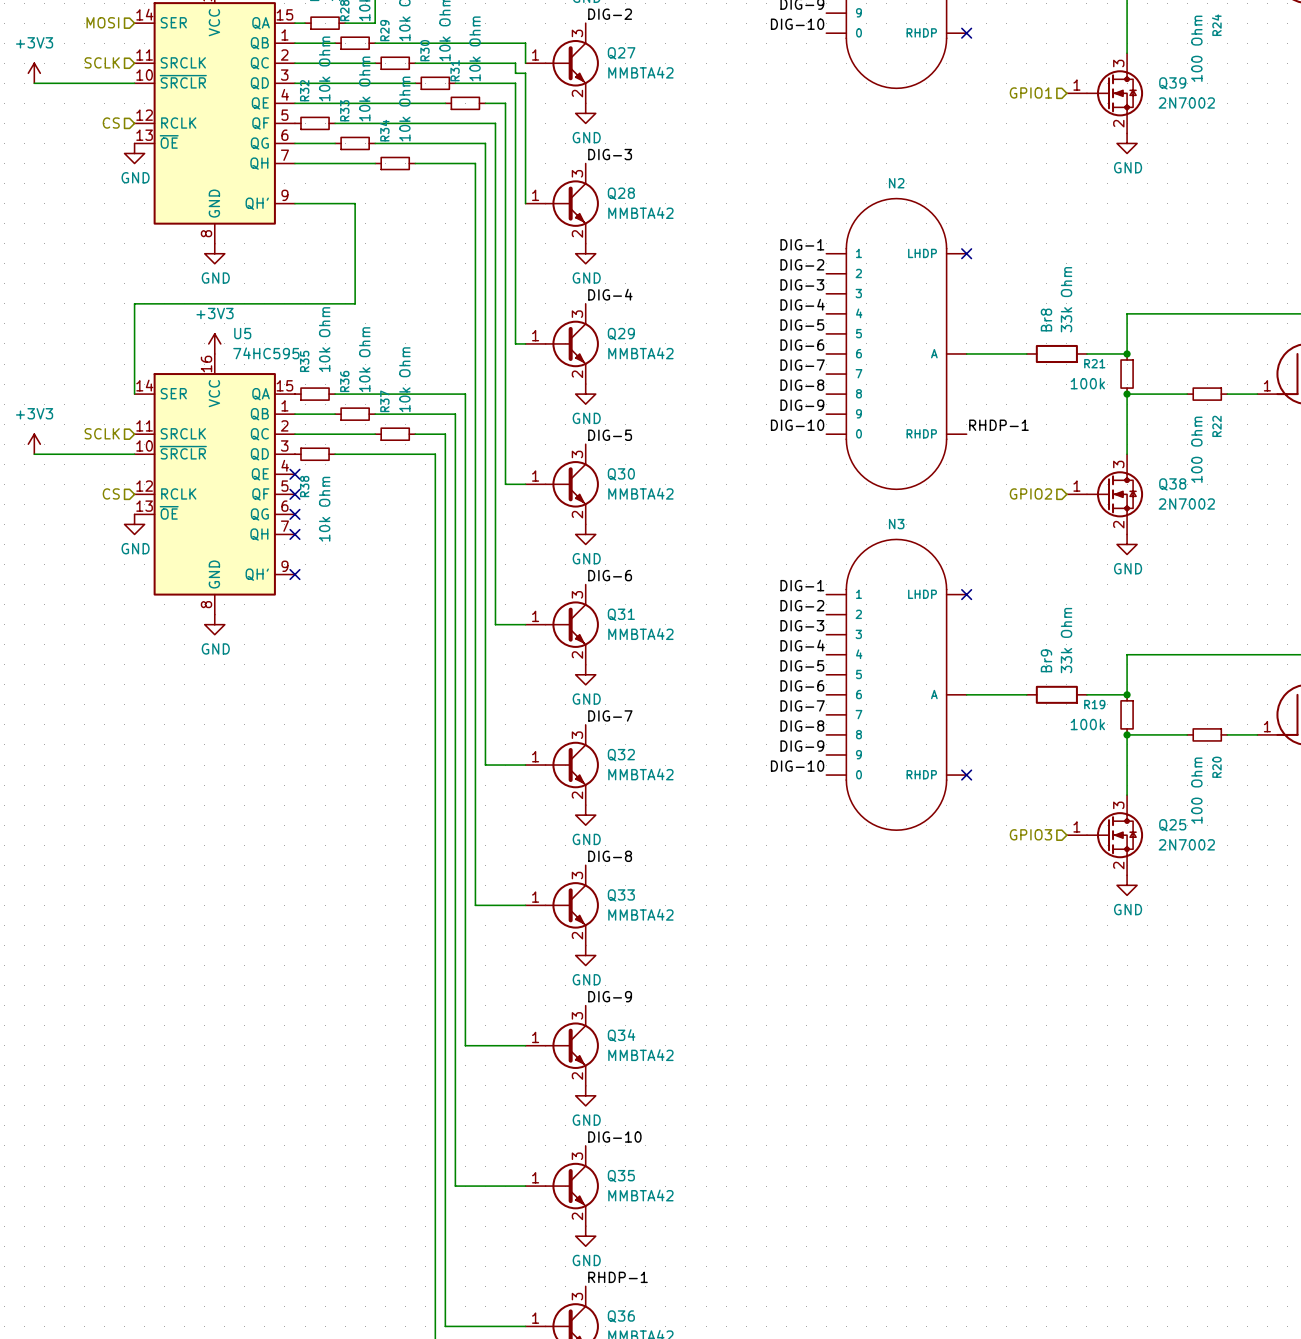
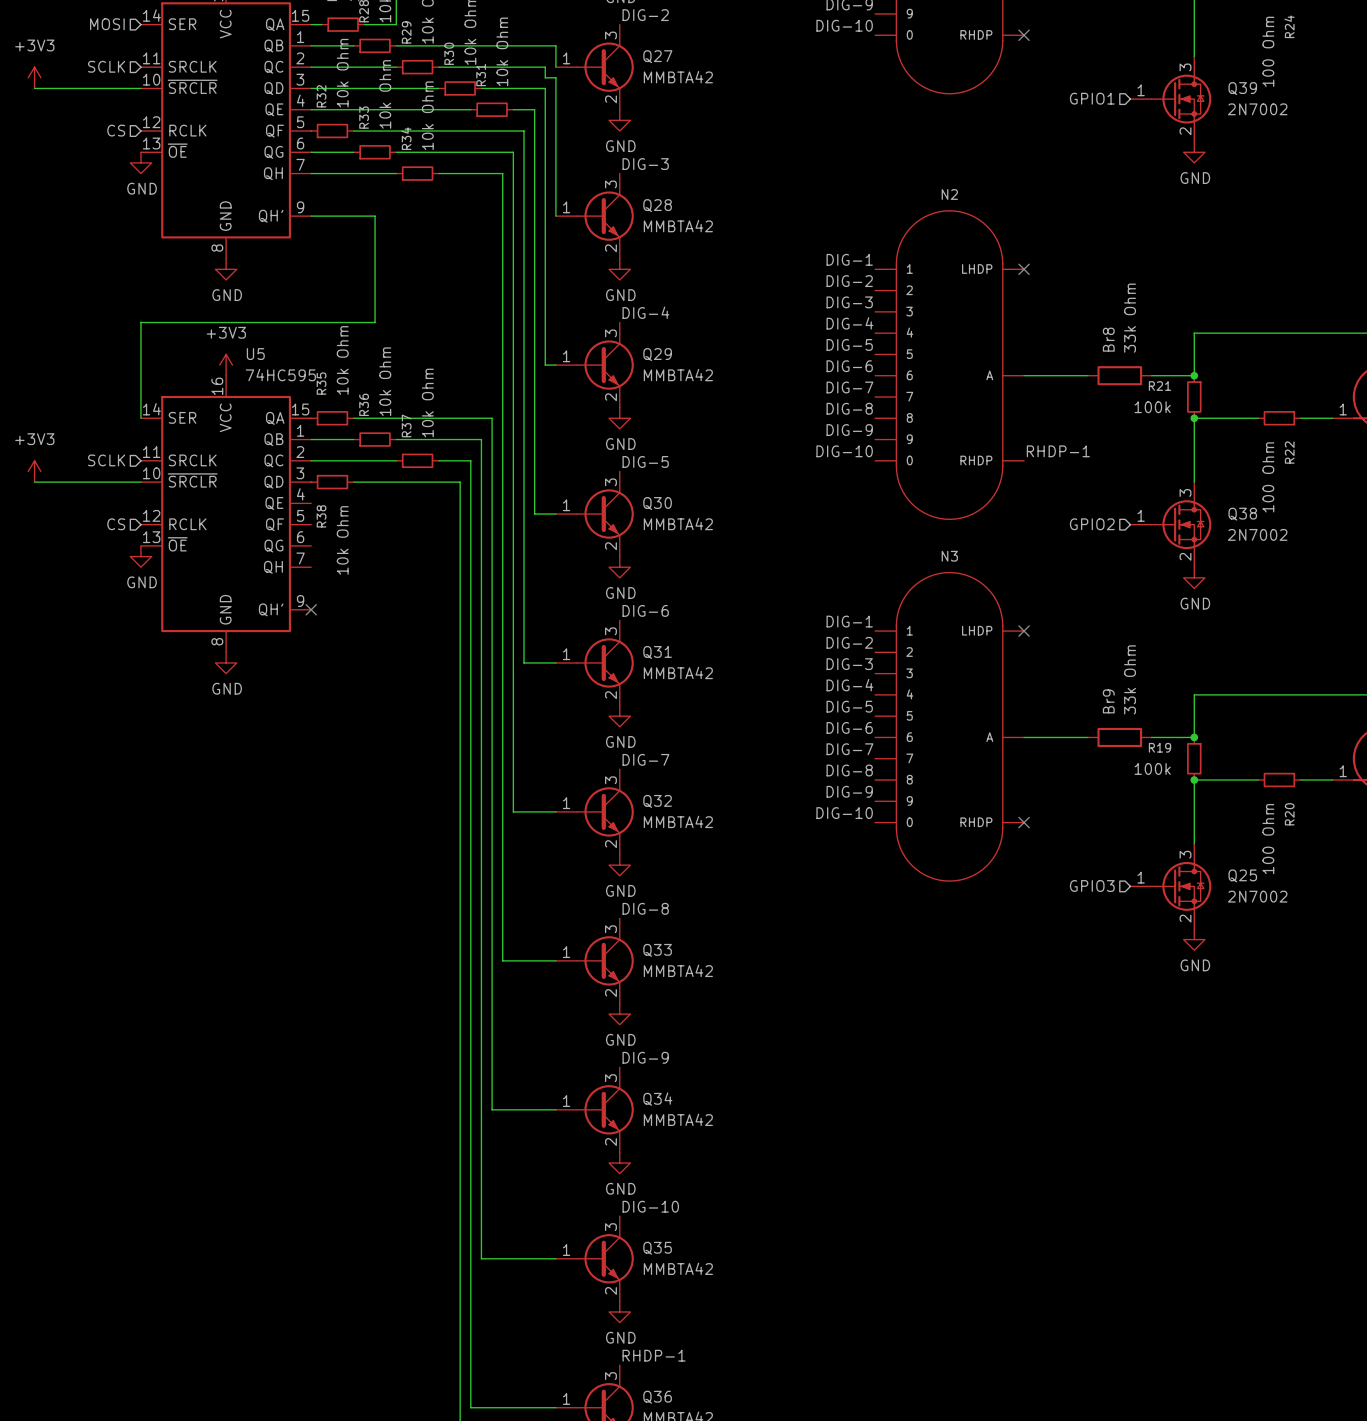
no-connect mark: (294, 474) -> none
no-connect mark: (294, 494) -> none
no-connect mark: (294, 514) -> none
no-connect mark: (294, 534) -> none

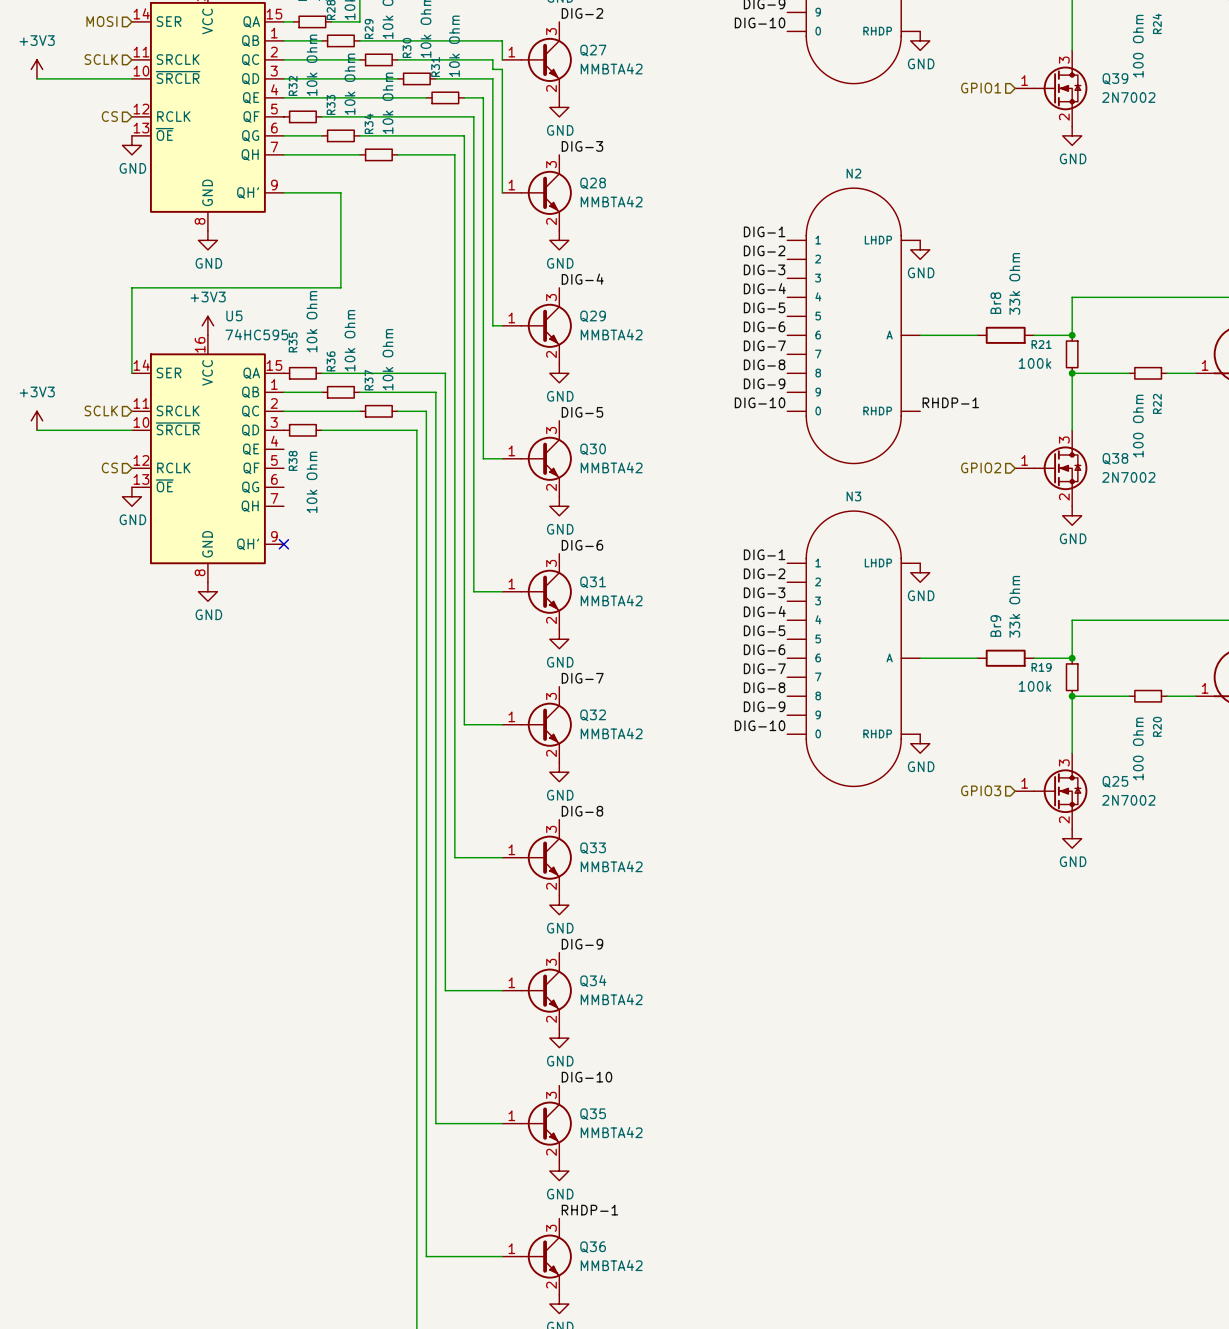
no-connect mark: (1024, 35) -> none
power symbol: none -> GND (920, 40)
no-connect mark: (1024, 269) -> none
power symbol: none -> GND (920, 249)
no-connect mark: (1024, 631) -> none
power symbol: none -> GND (920, 572)
no-connect mark: (1024, 822) -> none
power symbol: none -> GND (920, 743)

